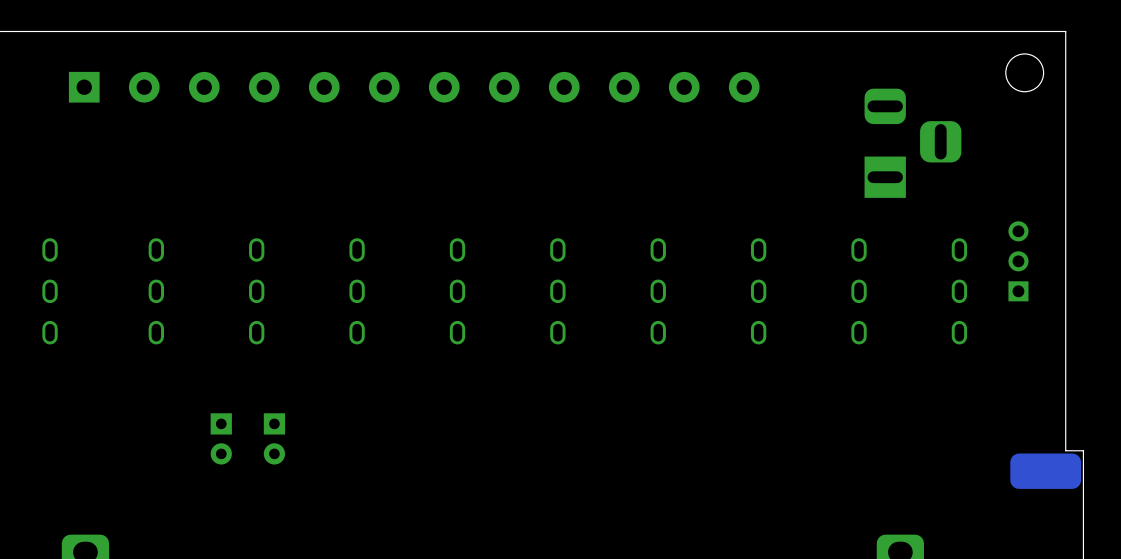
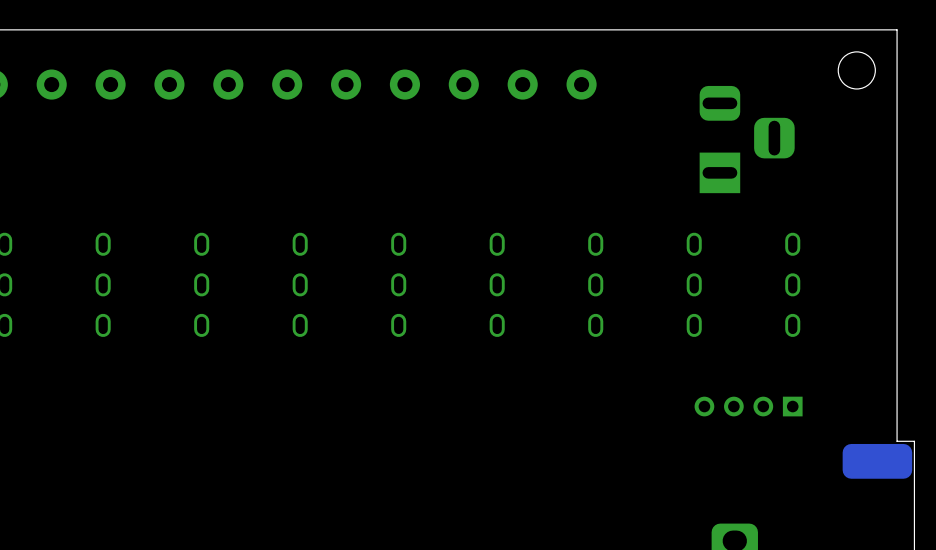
part: (1018, 261) -> none
part: none -> (748, 406)
part: (221, 438) -> none
part: (274, 438) -> none

